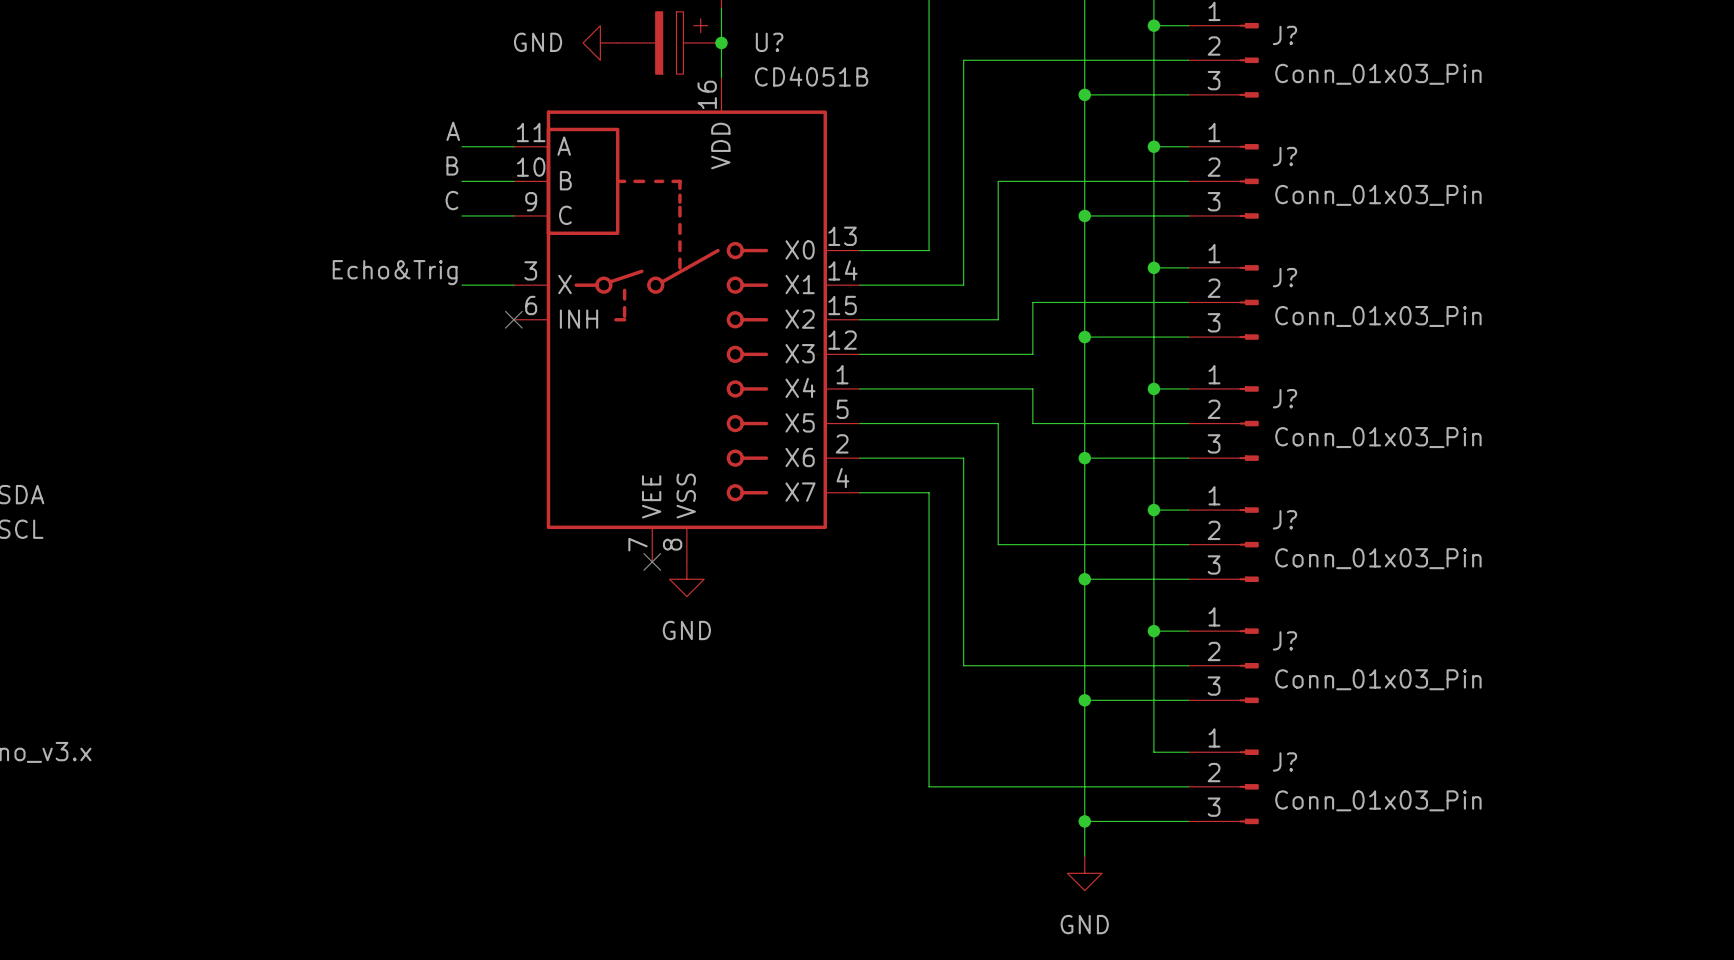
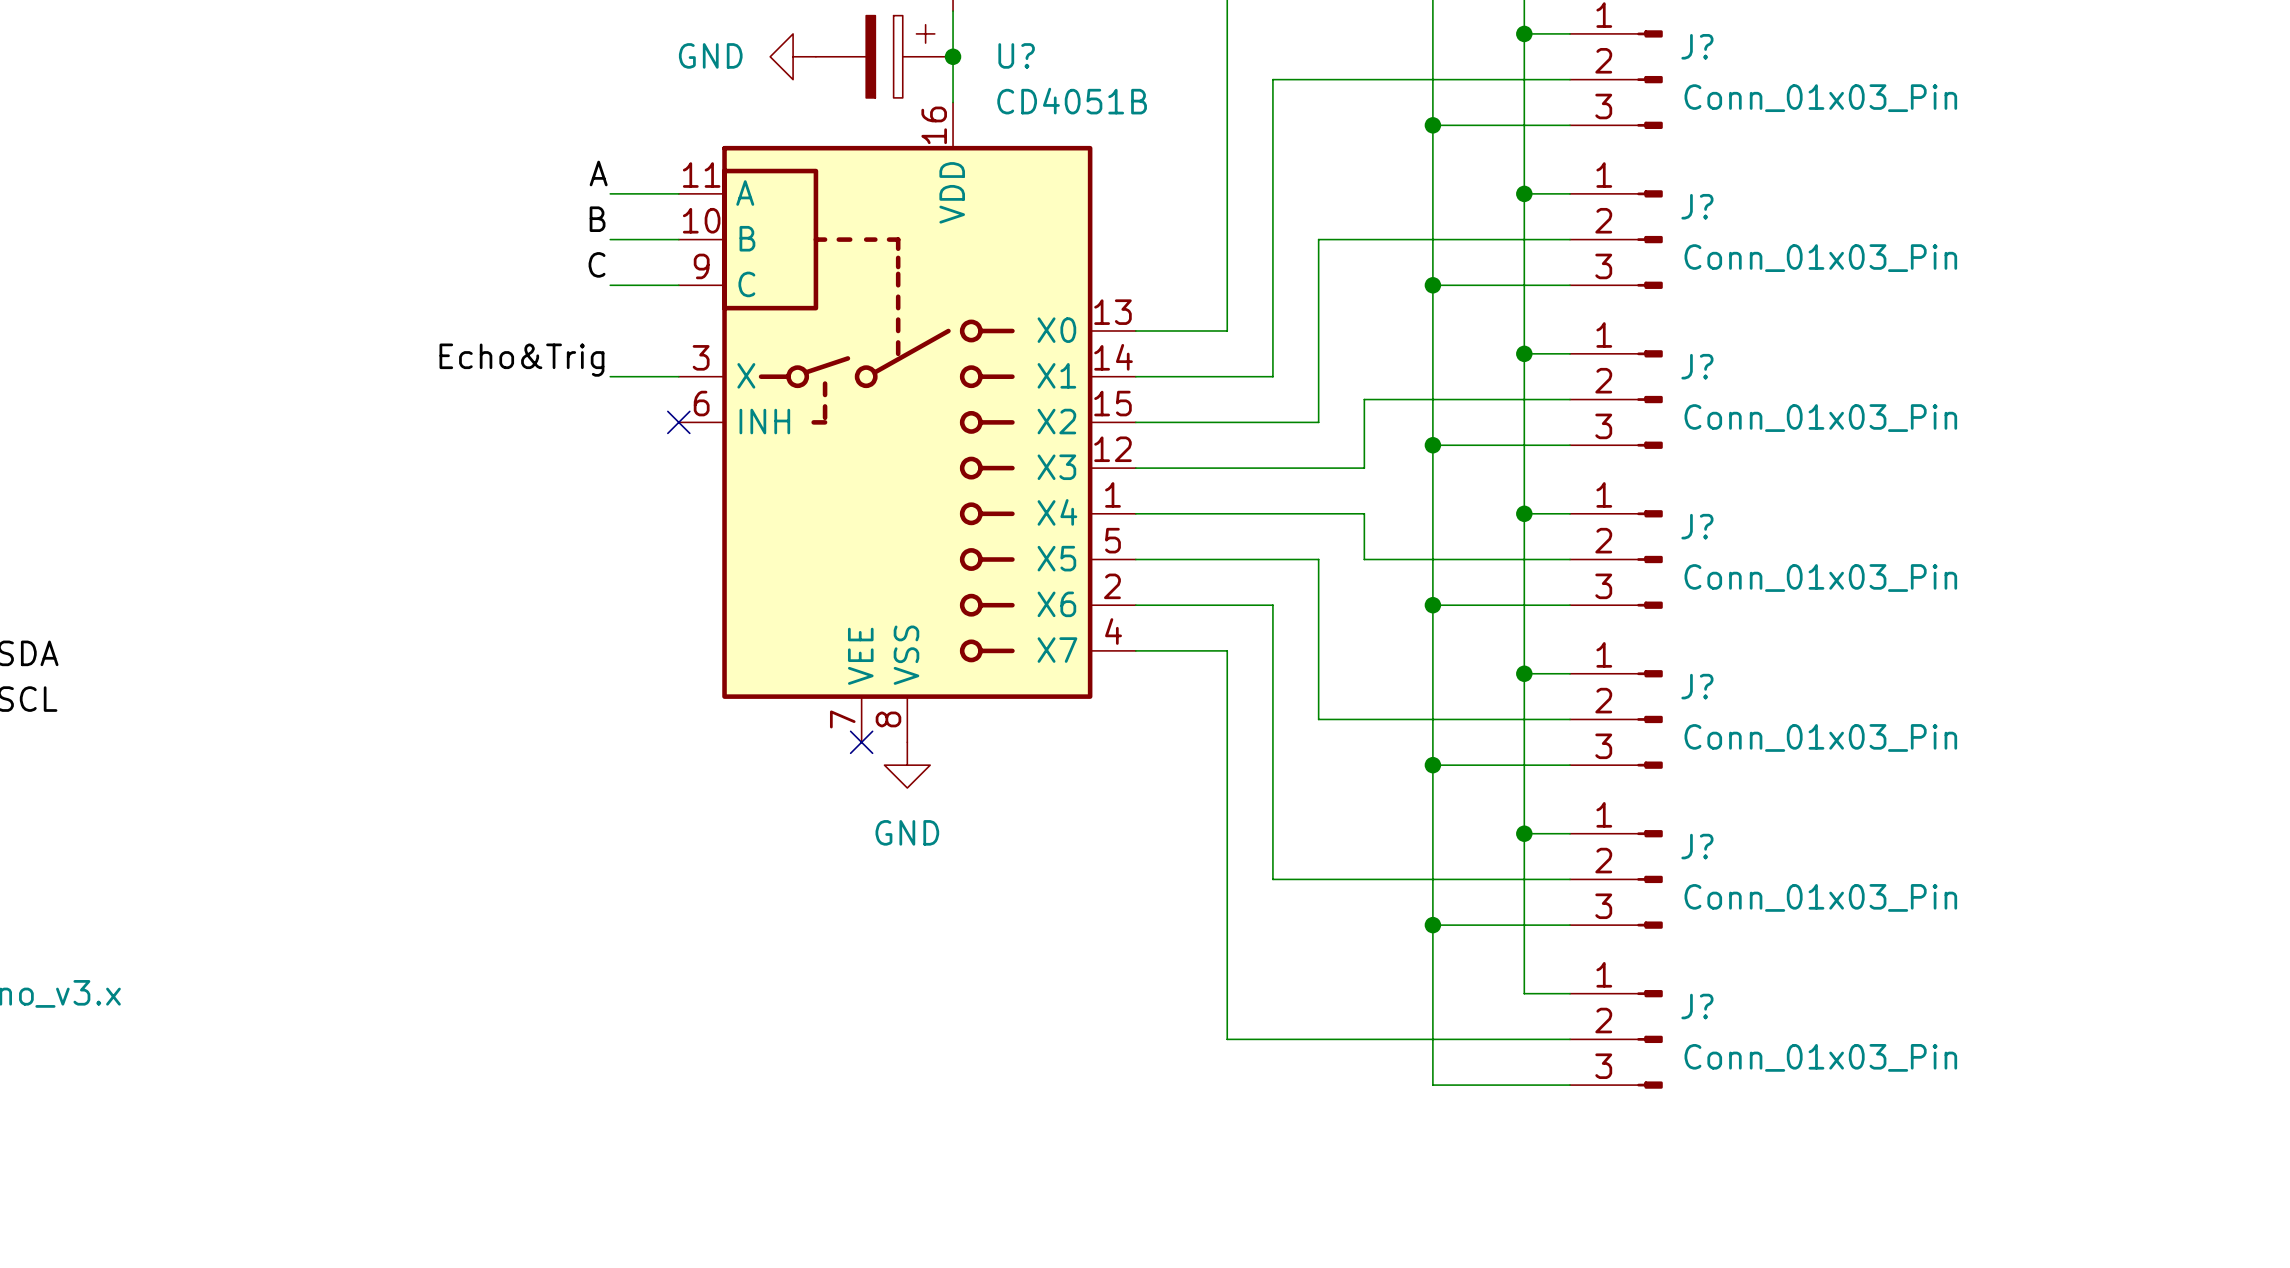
wire: (1084, 821) (1084, 856) -> none
junction: (1084, 821) -> none
power symbol: GND (1084, 873) -> none

